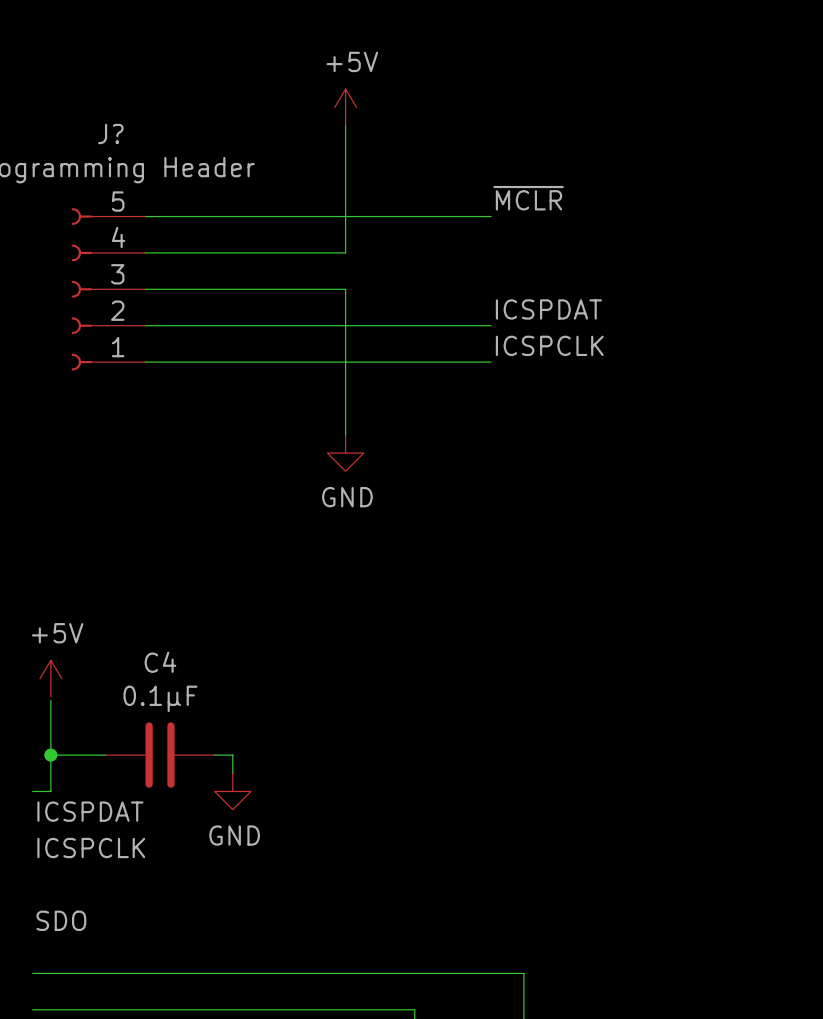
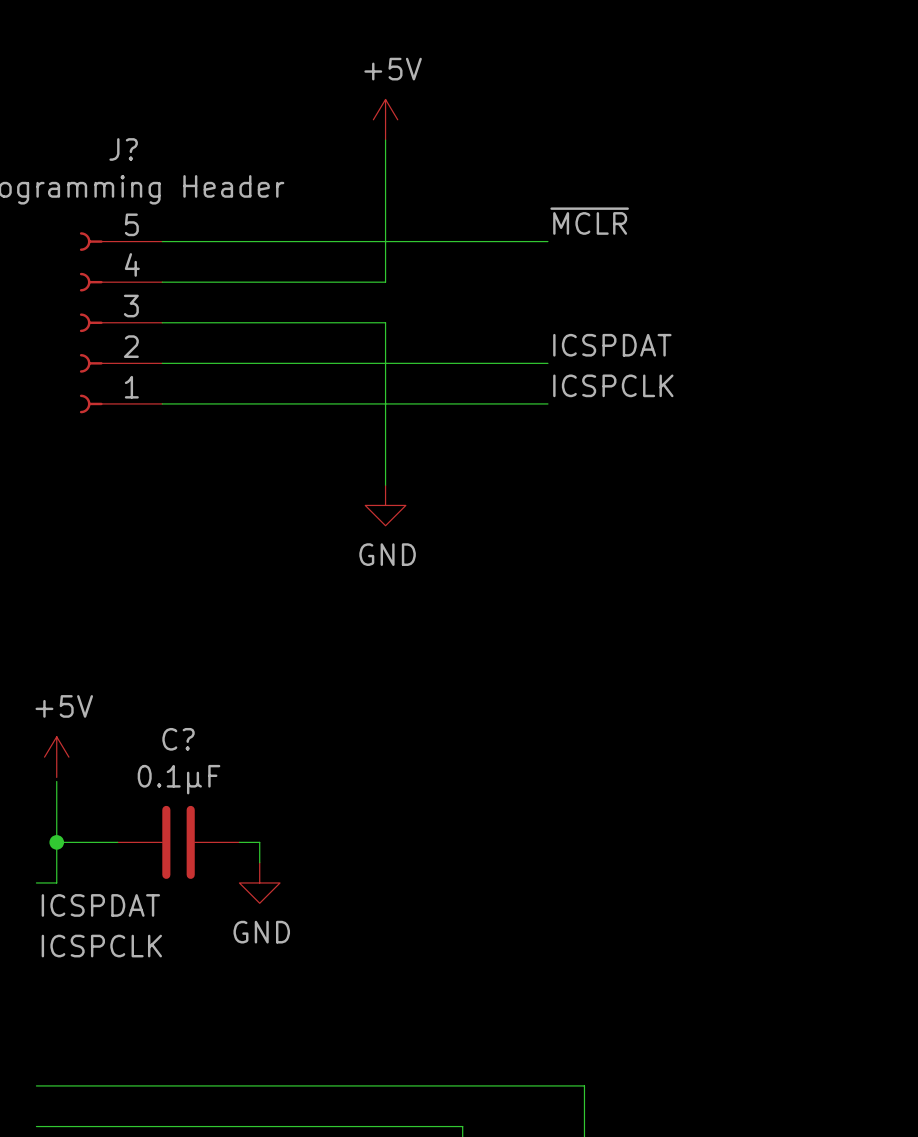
C4 name: C4 (160, 662) -> C? (178, 739)
label: SDO (61, 920) -> none

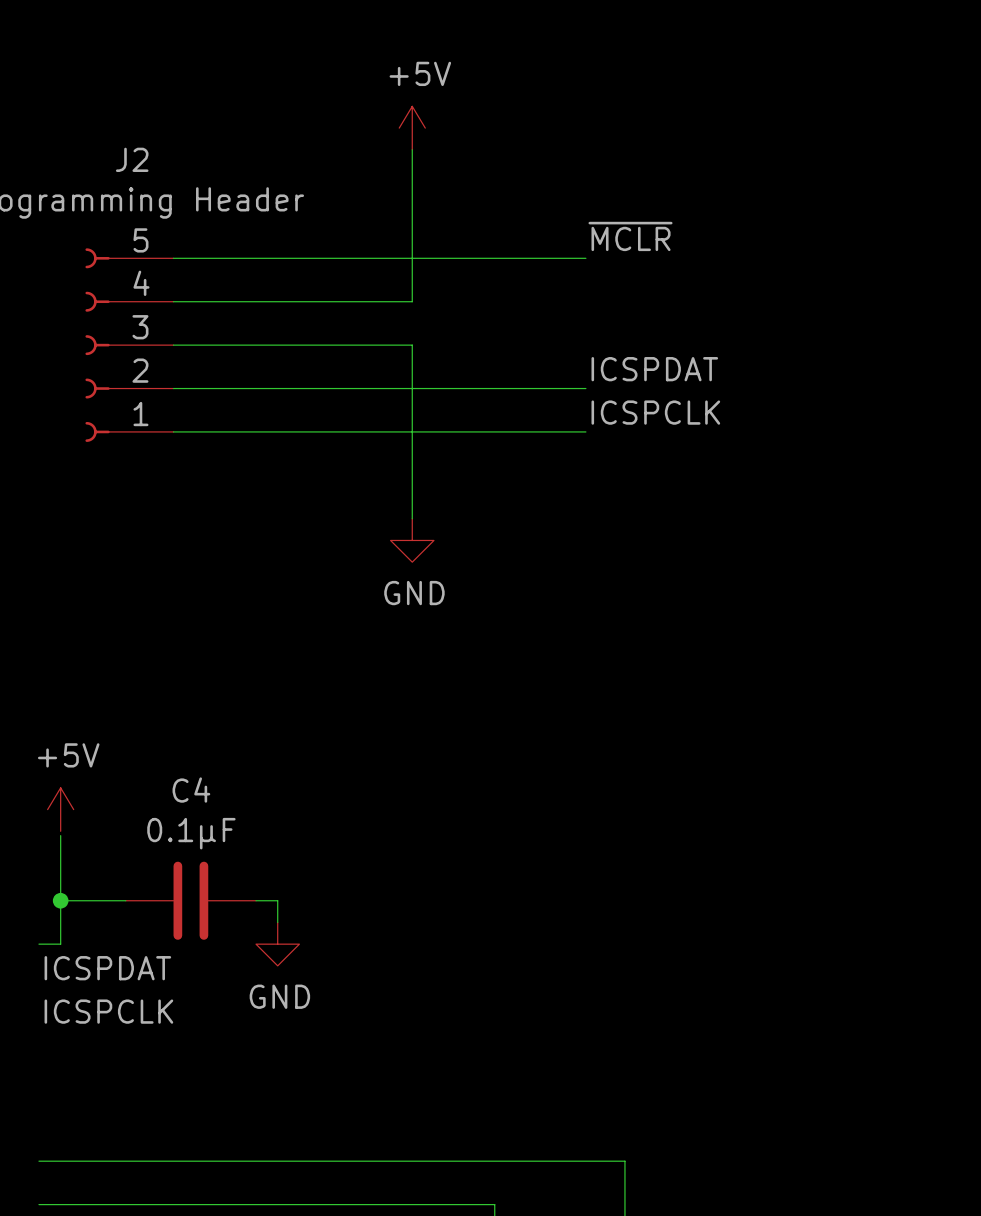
J? name: J? (123, 149) -> J2 (132, 159)
C? name: C? (178, 739) -> C4 (191, 790)

